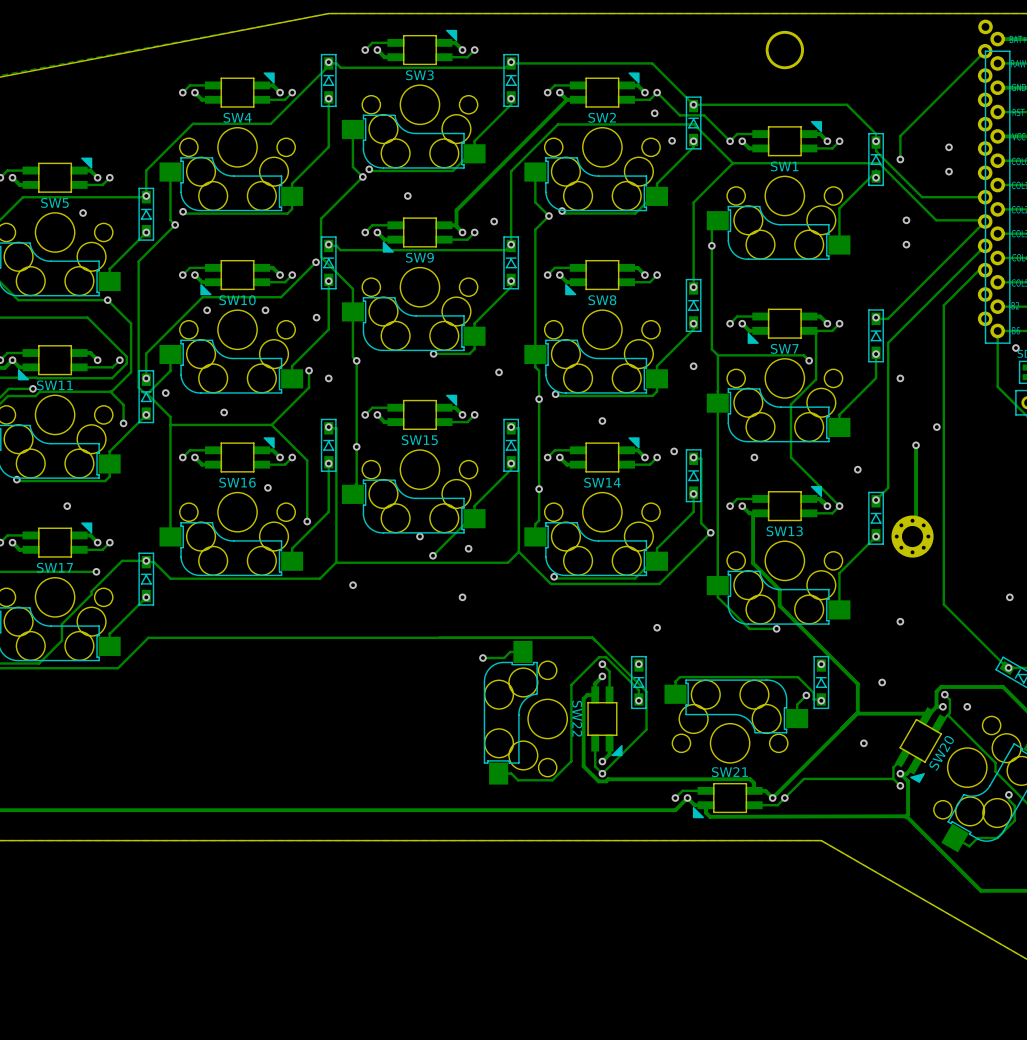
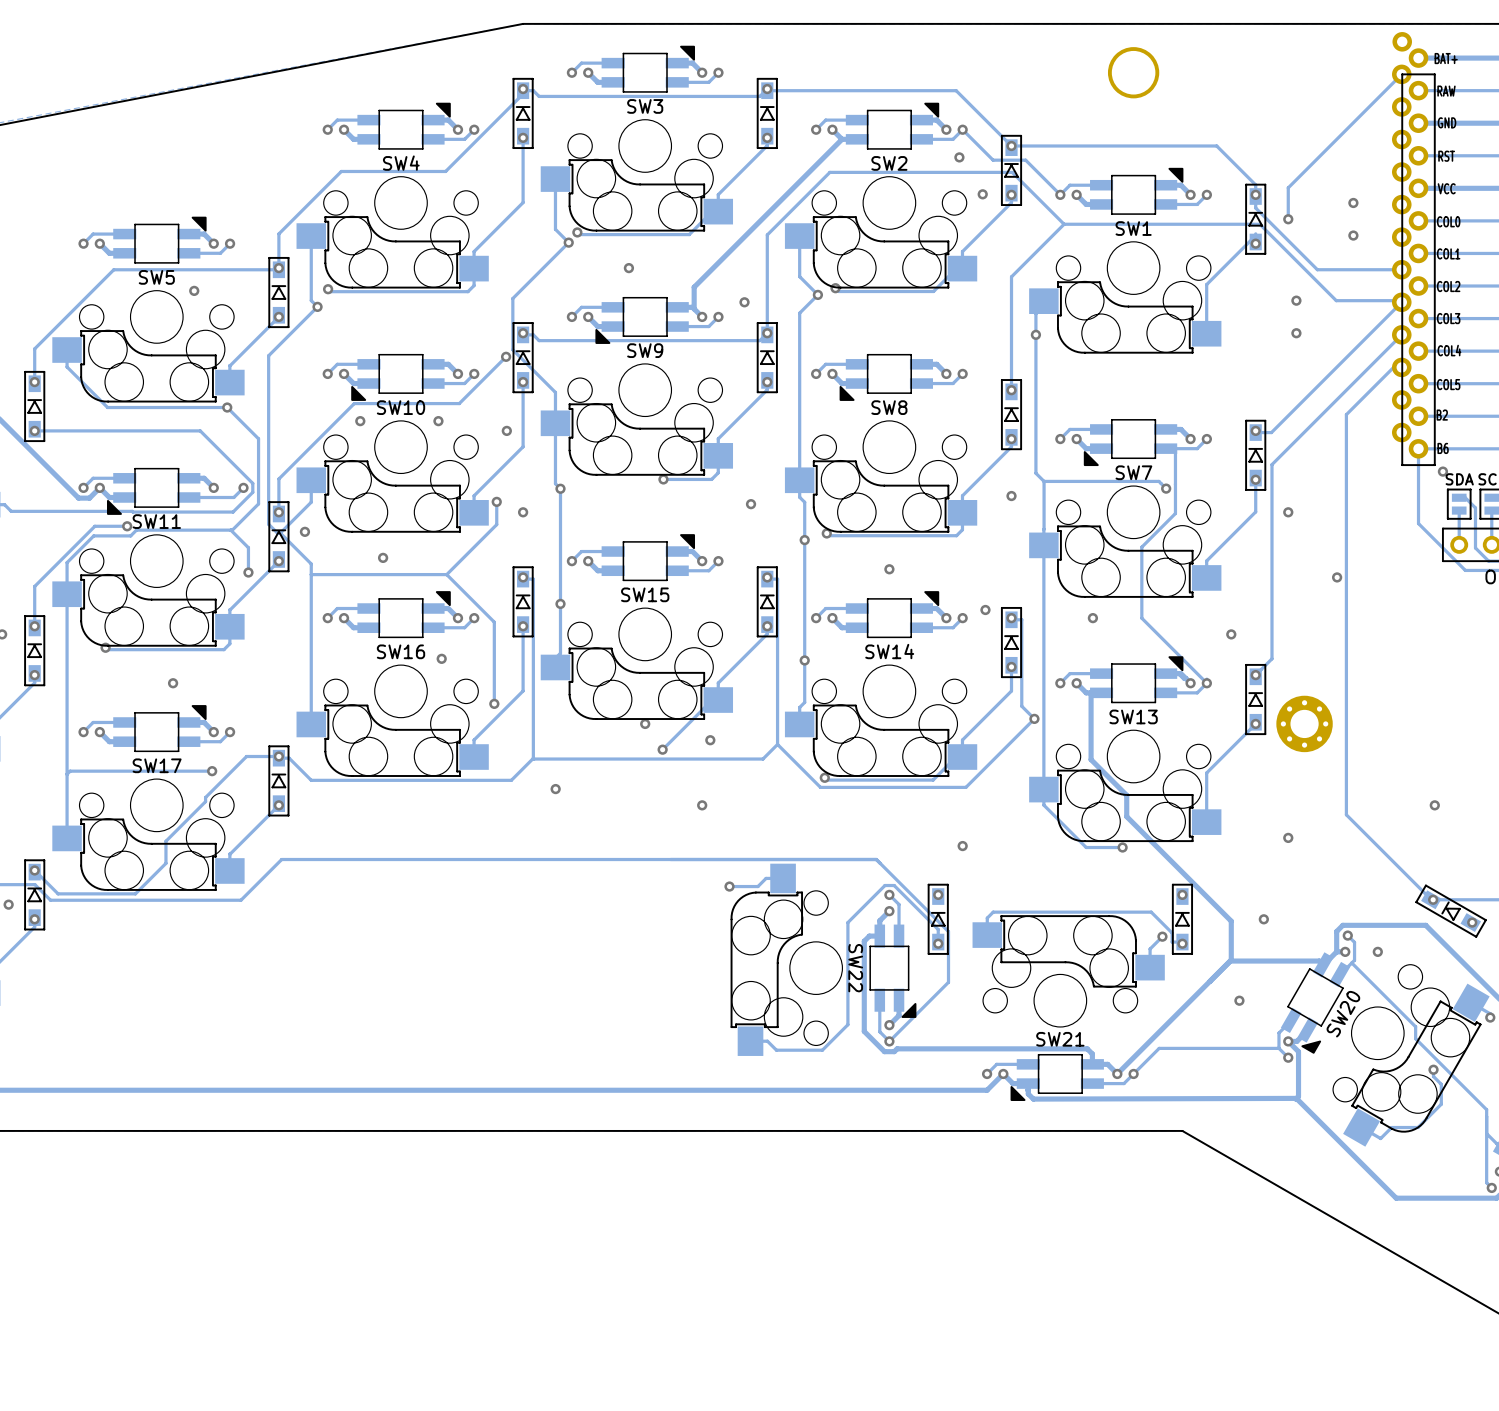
track: (916, 445) (916, 517) (912, 520) (912, 536) -> none
via: (916, 445) -> none

